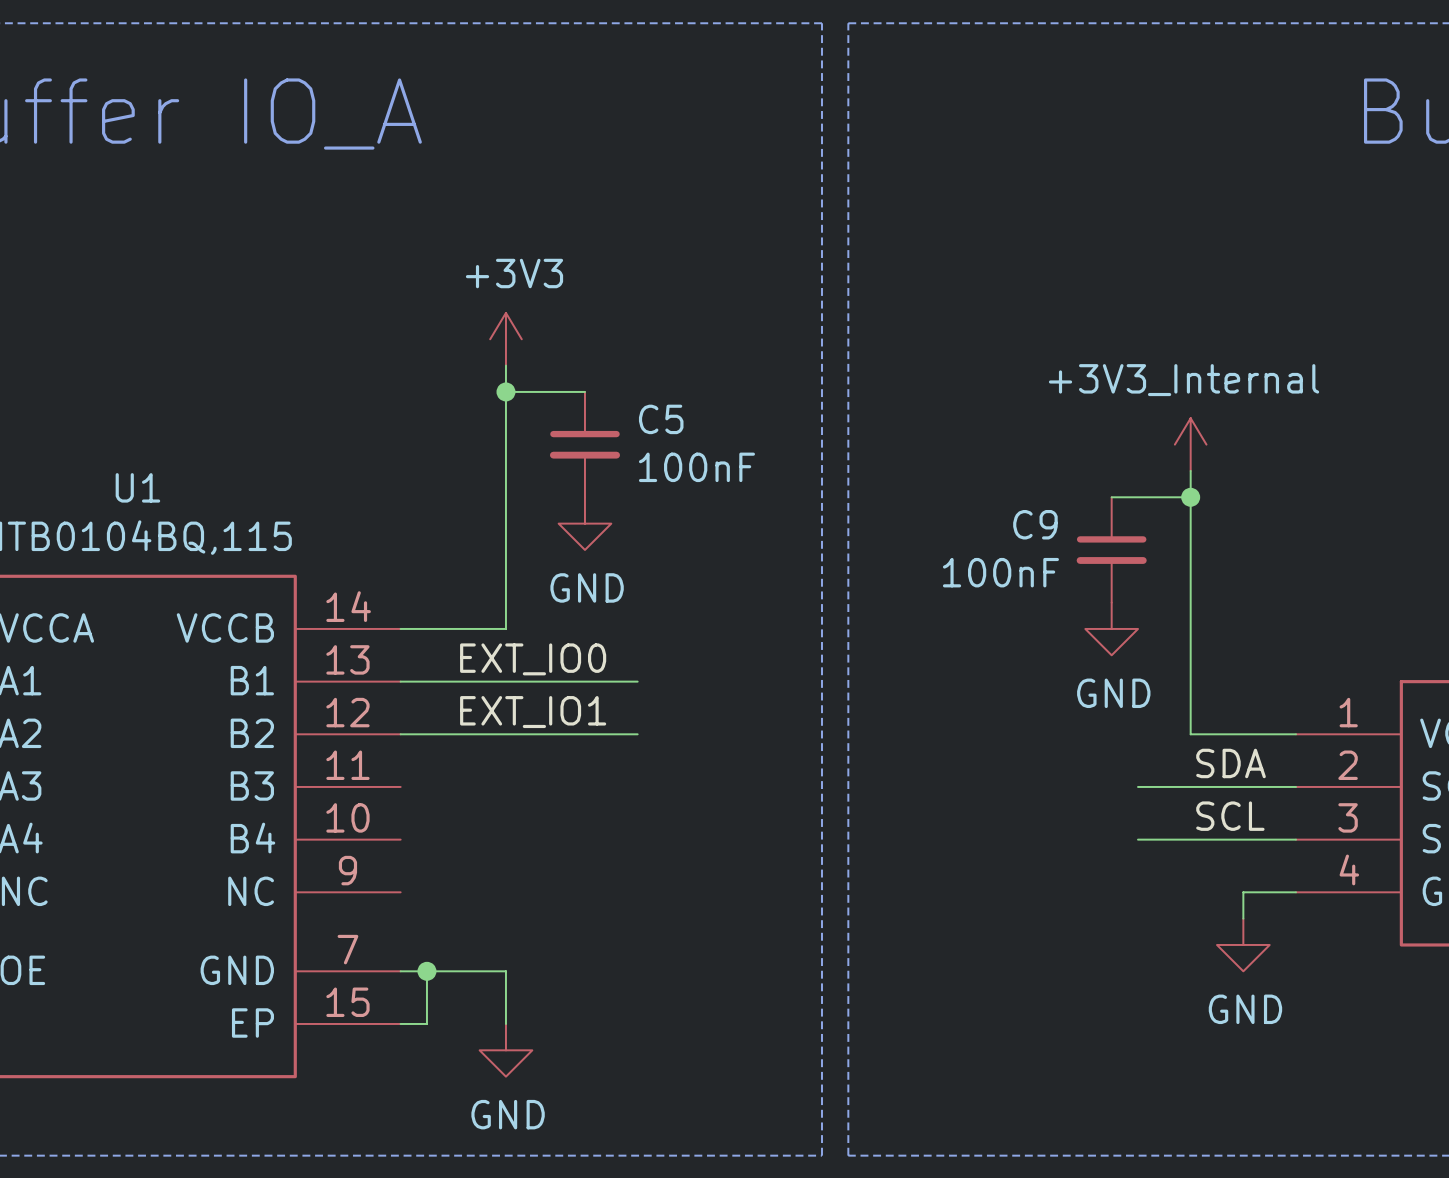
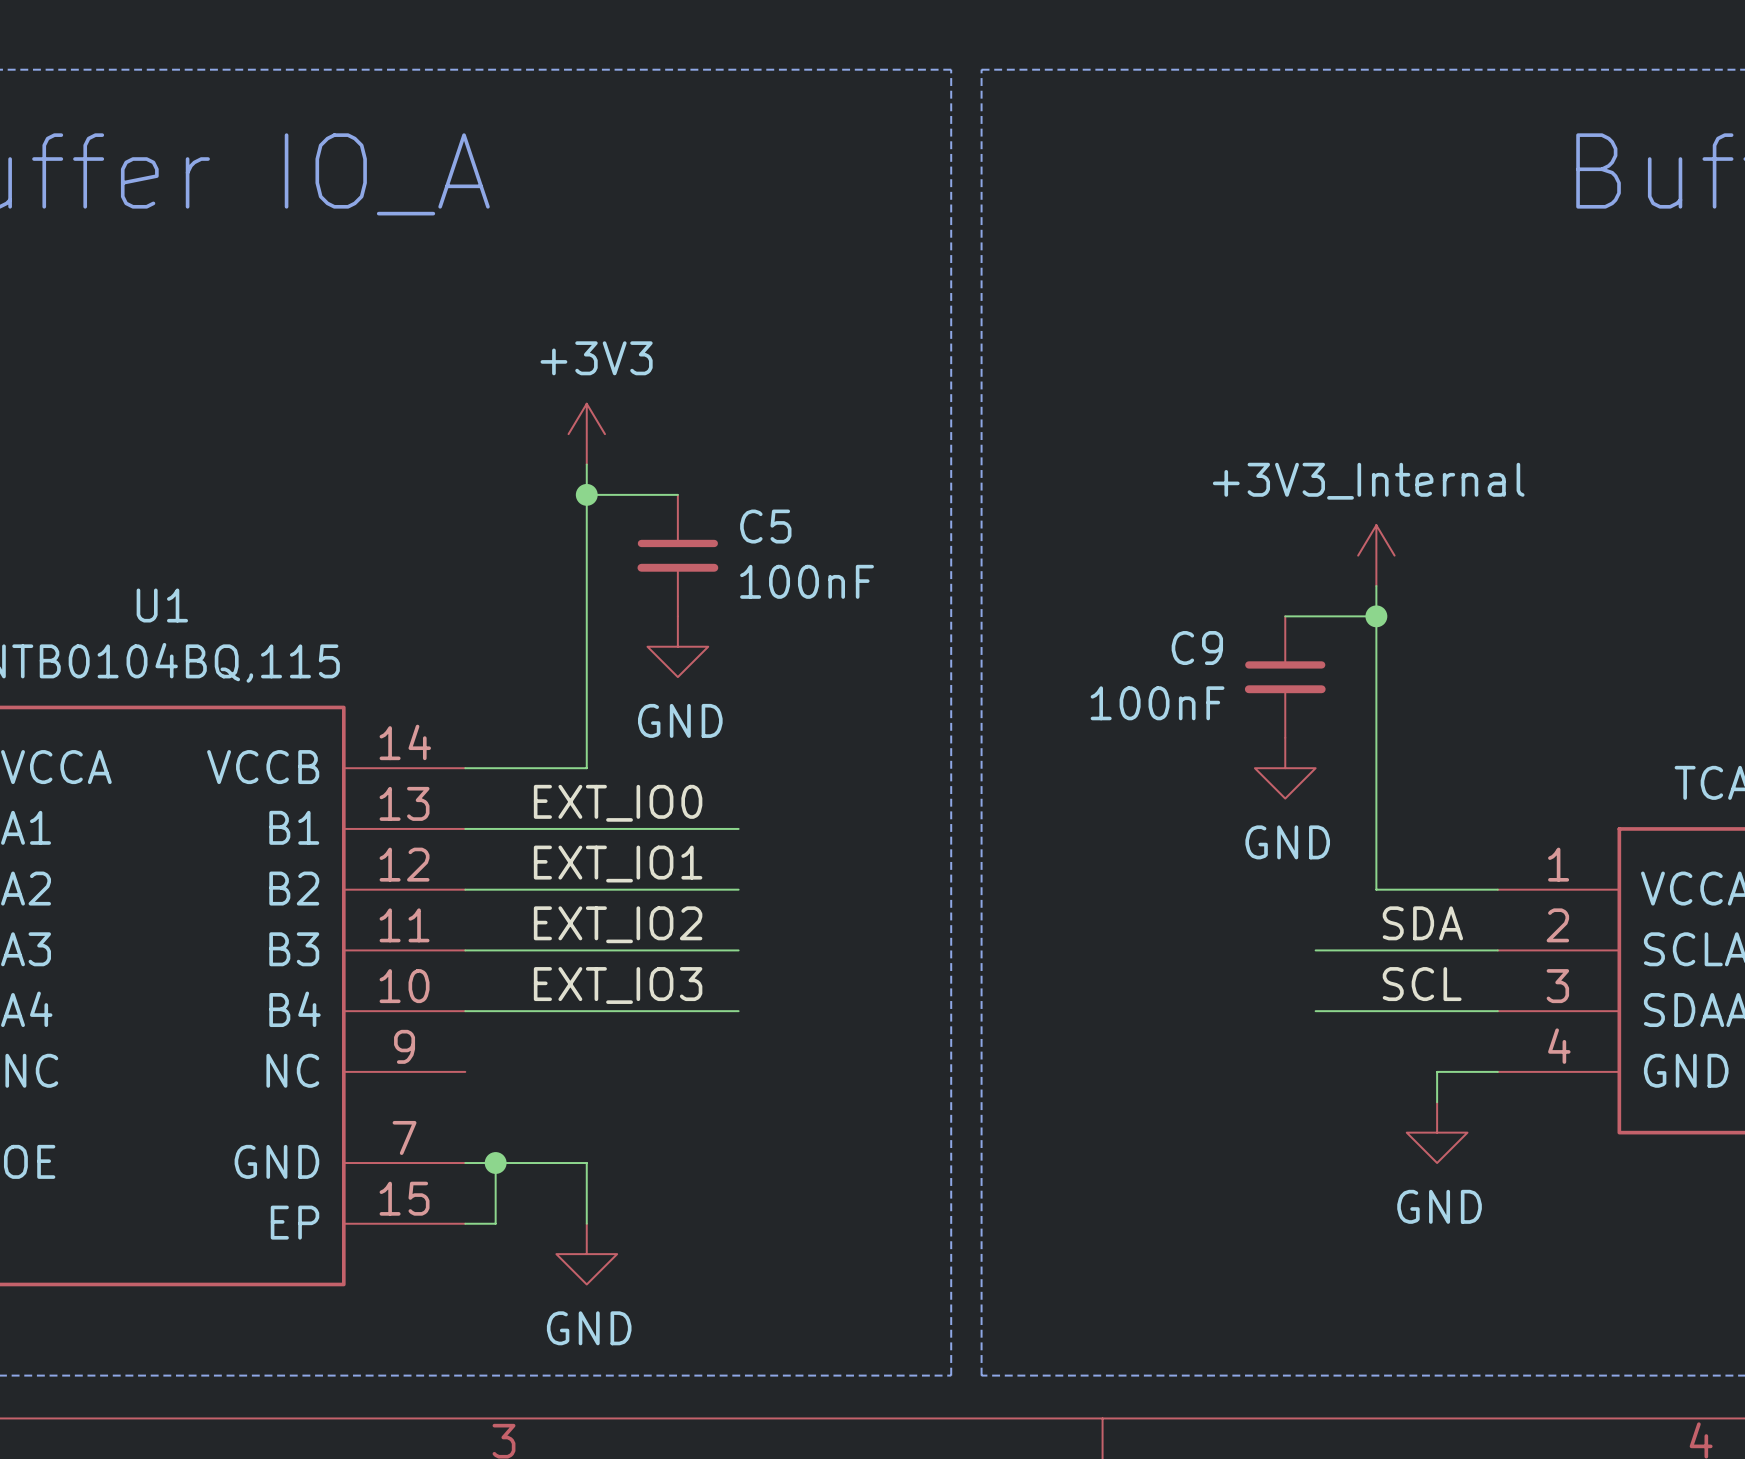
label: none -> EXT_IO2 (618, 924)
wire: none -> (465, 950) (738, 950)
label: none -> EXT_IO3 (618, 985)
wire: none -> (465, 1011) (738, 1011)

